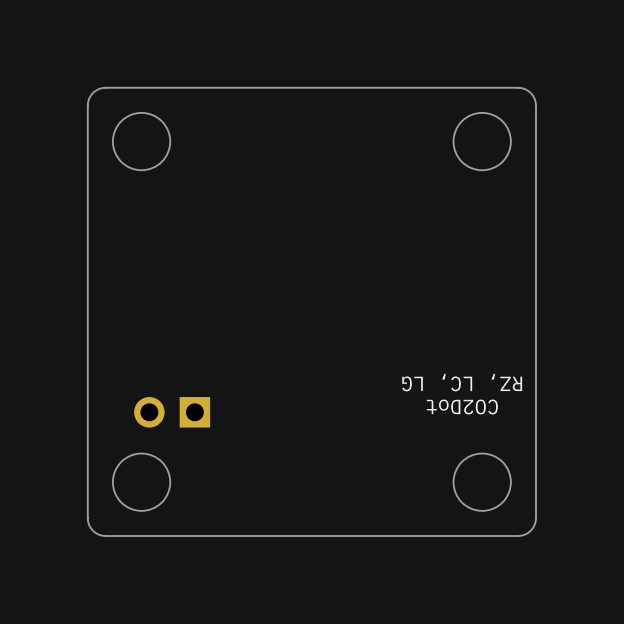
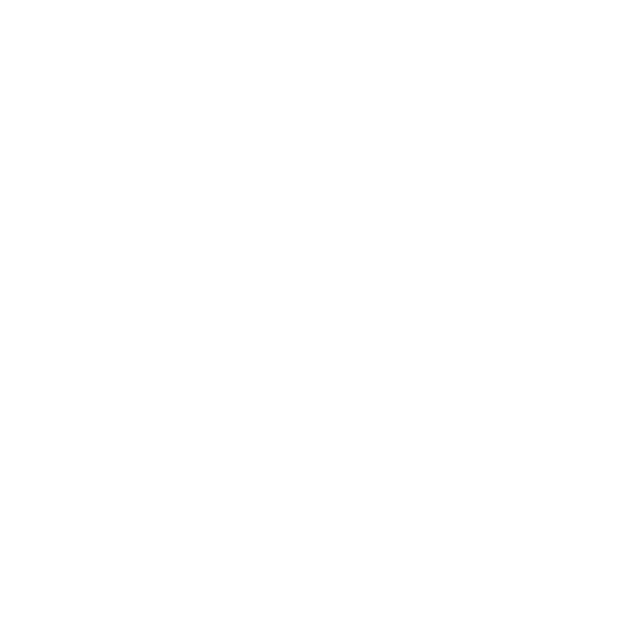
board edge: (518, 87) (105, 87) (93, 93) (87, 105) (87, 518) (93, 530) (105, 536) (518, 536) (530, 530) (536, 518) (536, 105) (530, 93) (518, 87) -> none
round board edge: [112, 112, 171, 171] -> none
round board edge: [453, 112, 512, 171] -> none
text: RZ, LC, LG (462, 382) -> none
text: CO2Dot (462, 406) -> none
part: (172, 412) -> none
round board edge: [112, 453, 171, 512] -> none
round board edge: [453, 453, 512, 512] -> none

